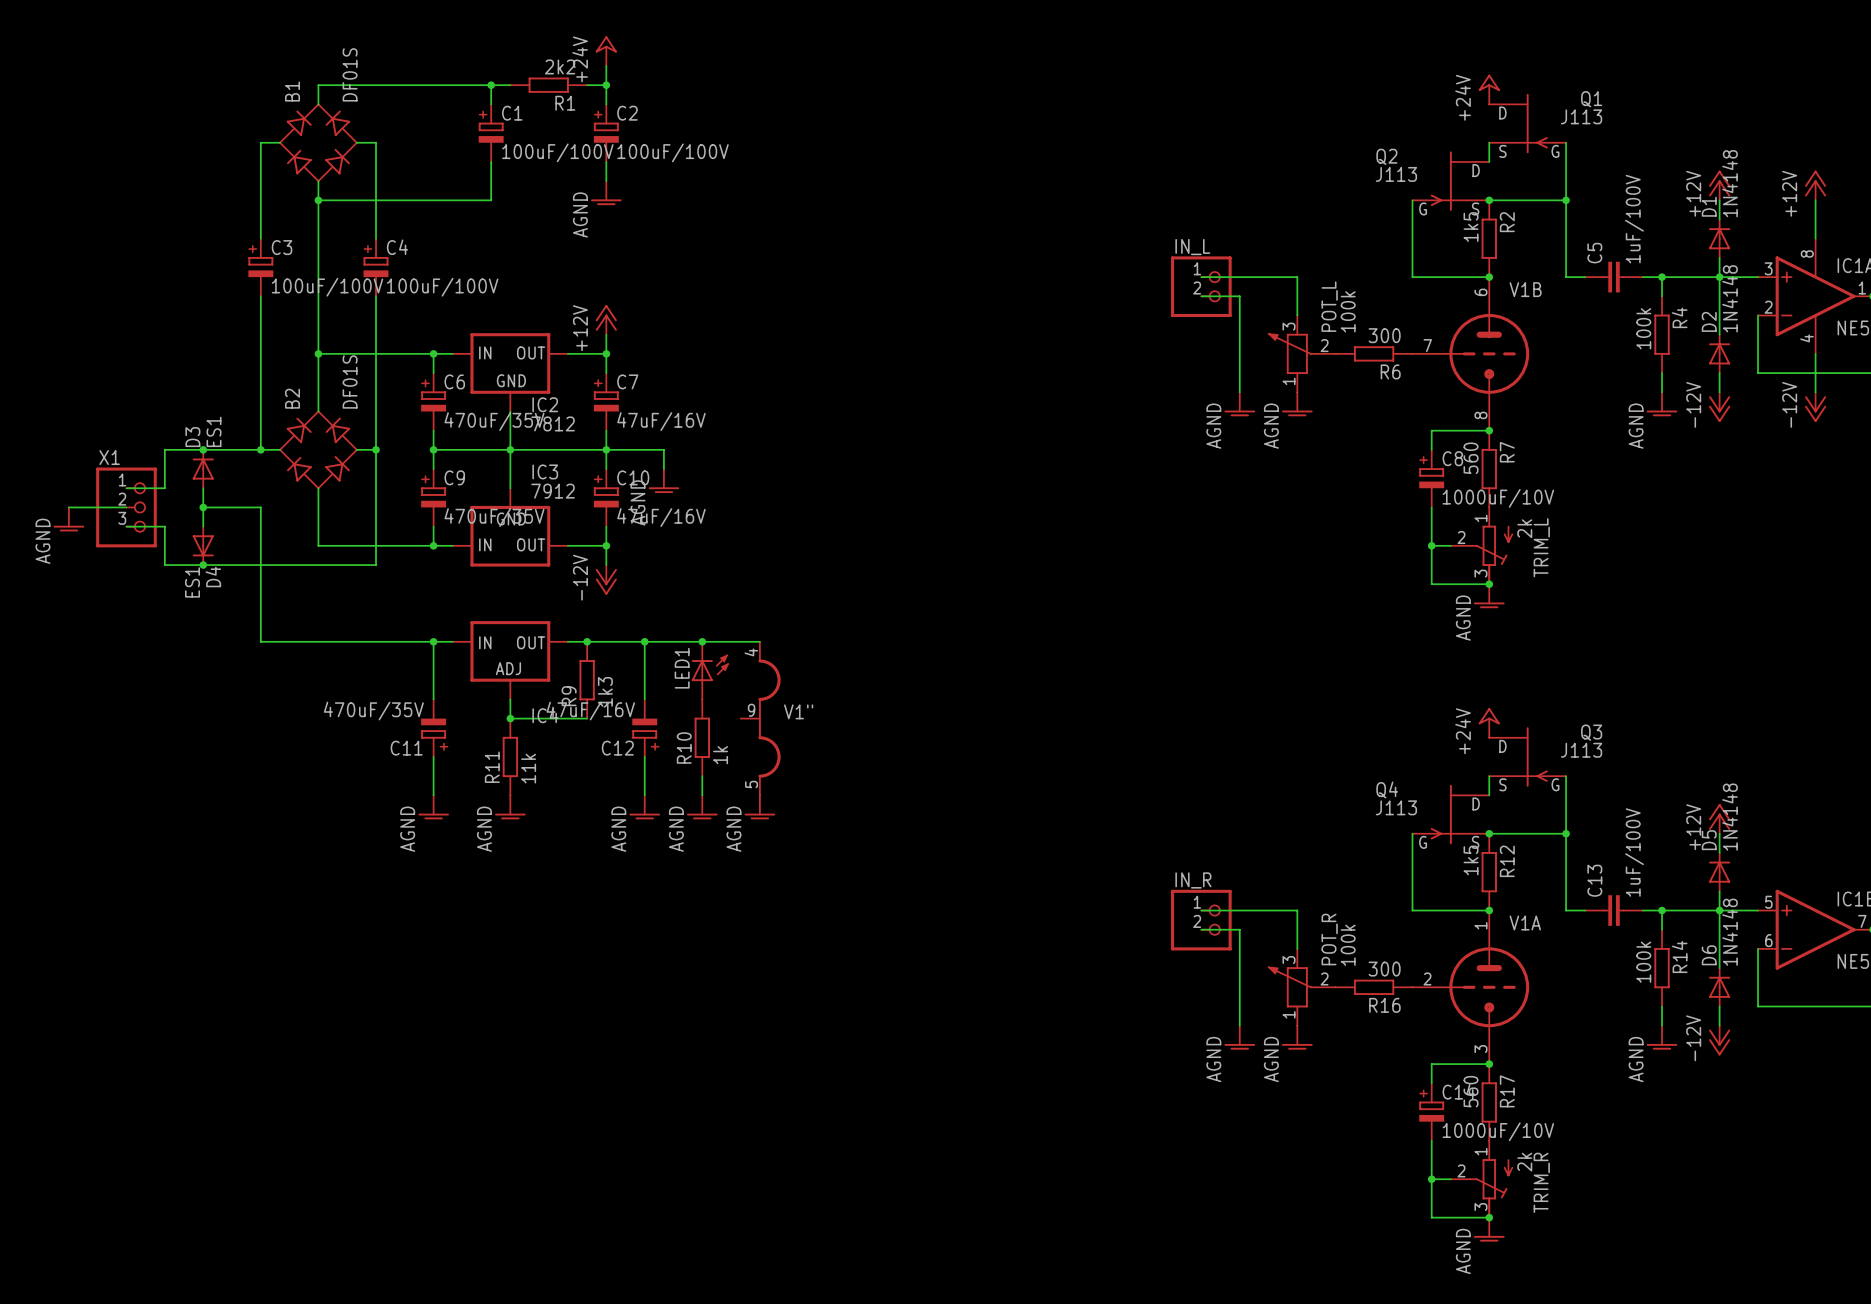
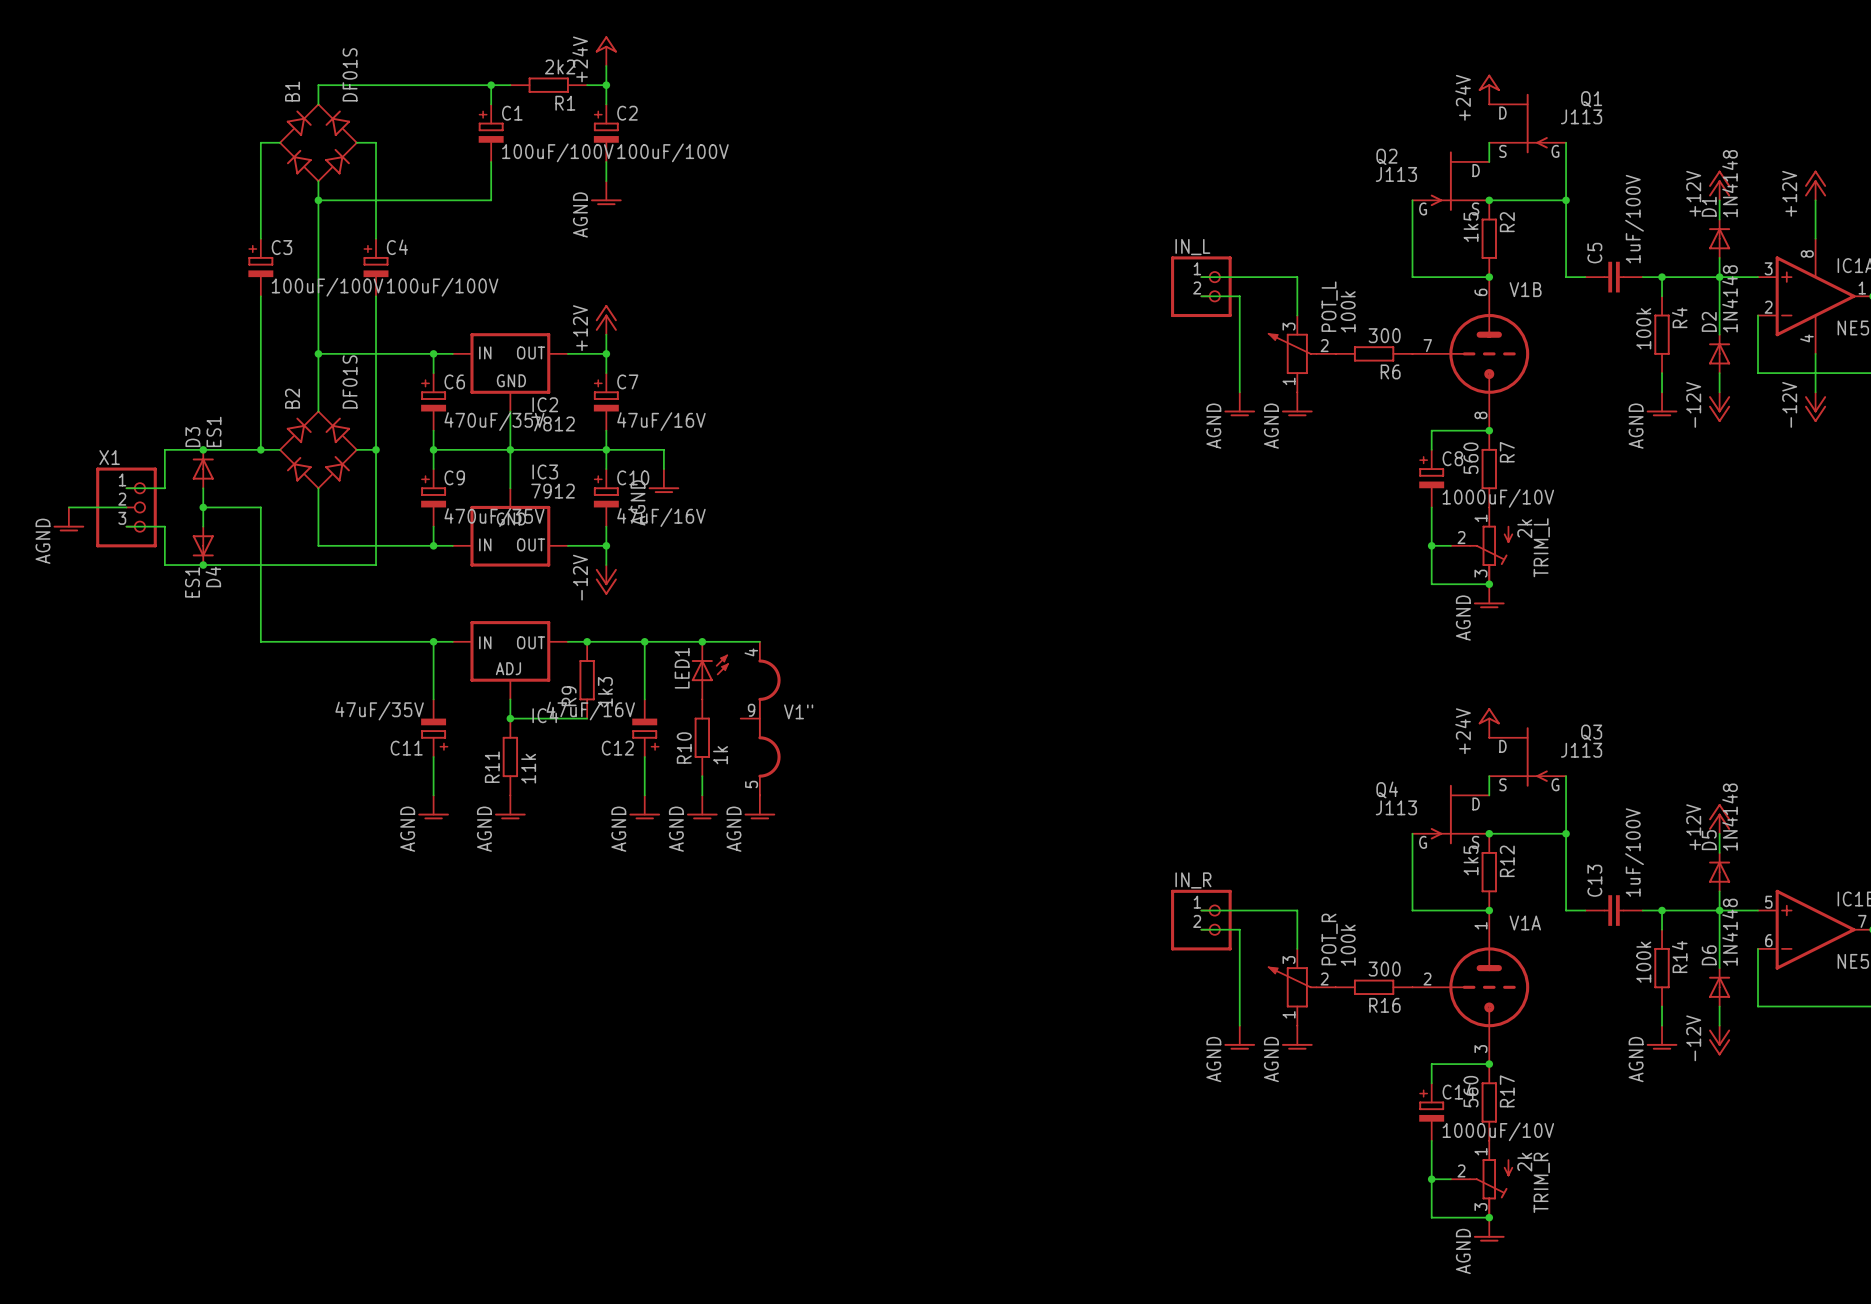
C11 value: 470uF/35V (373, 711) -> 47uF/35V (379, 711)

